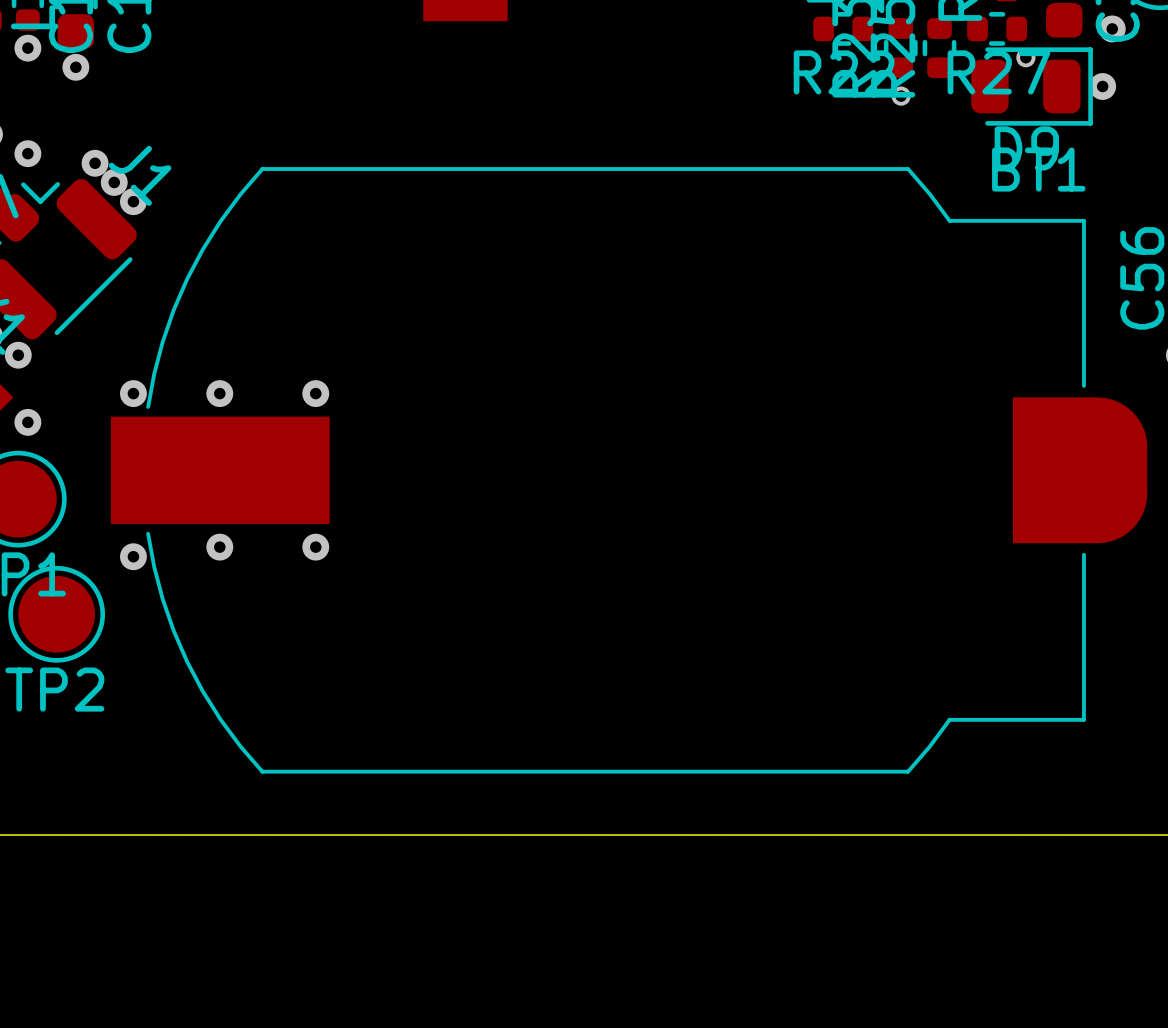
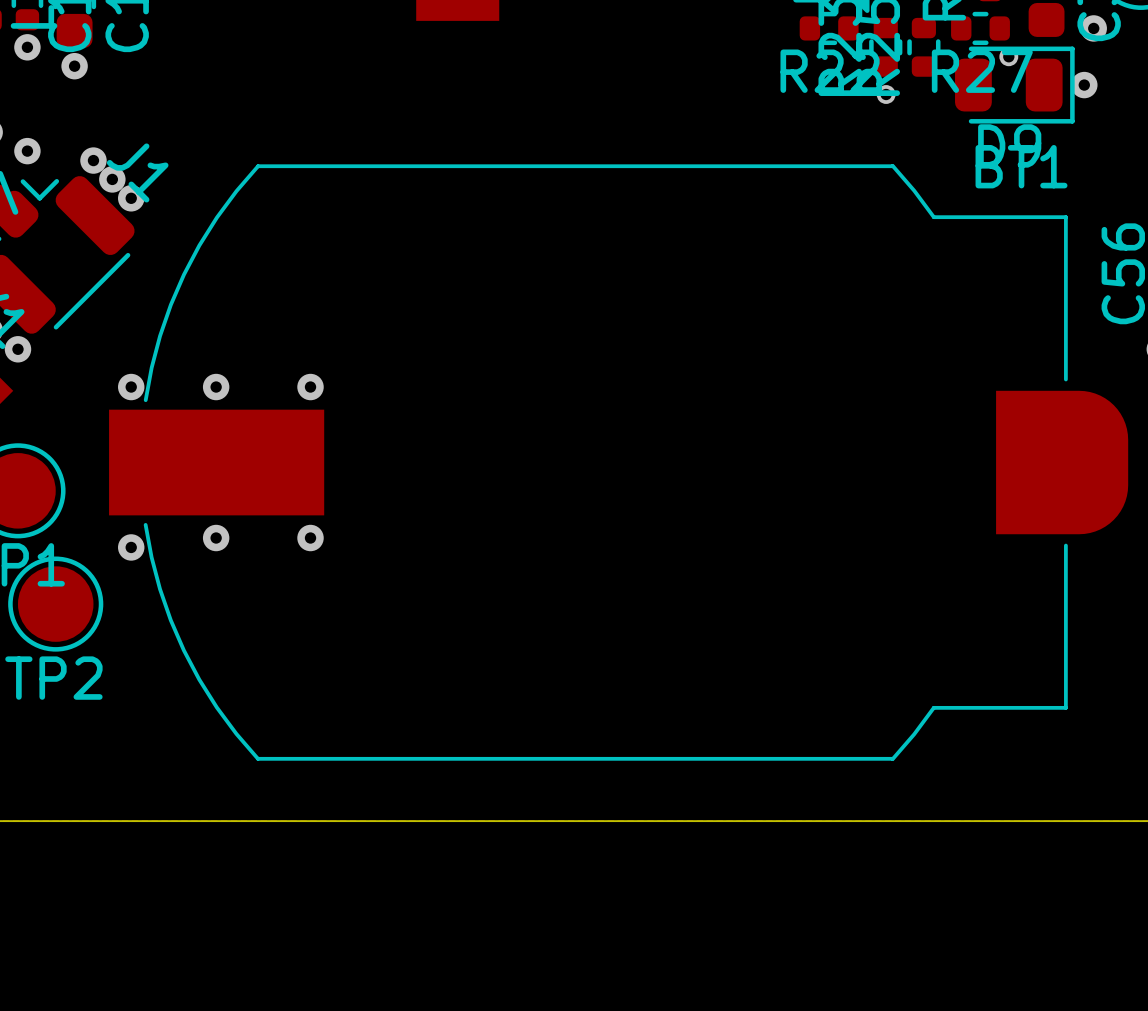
via: (27, 422) -> none

